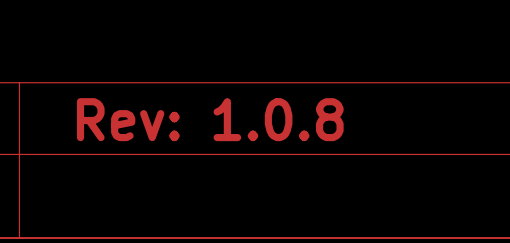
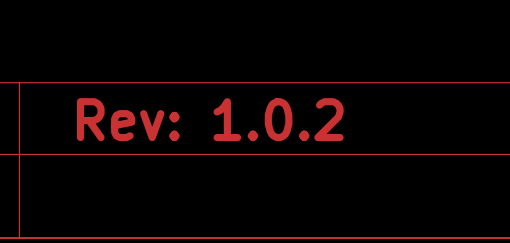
title block: Rev: 1.0.8 (210, 119) -> Rev: 1.0.2 (210, 119)

